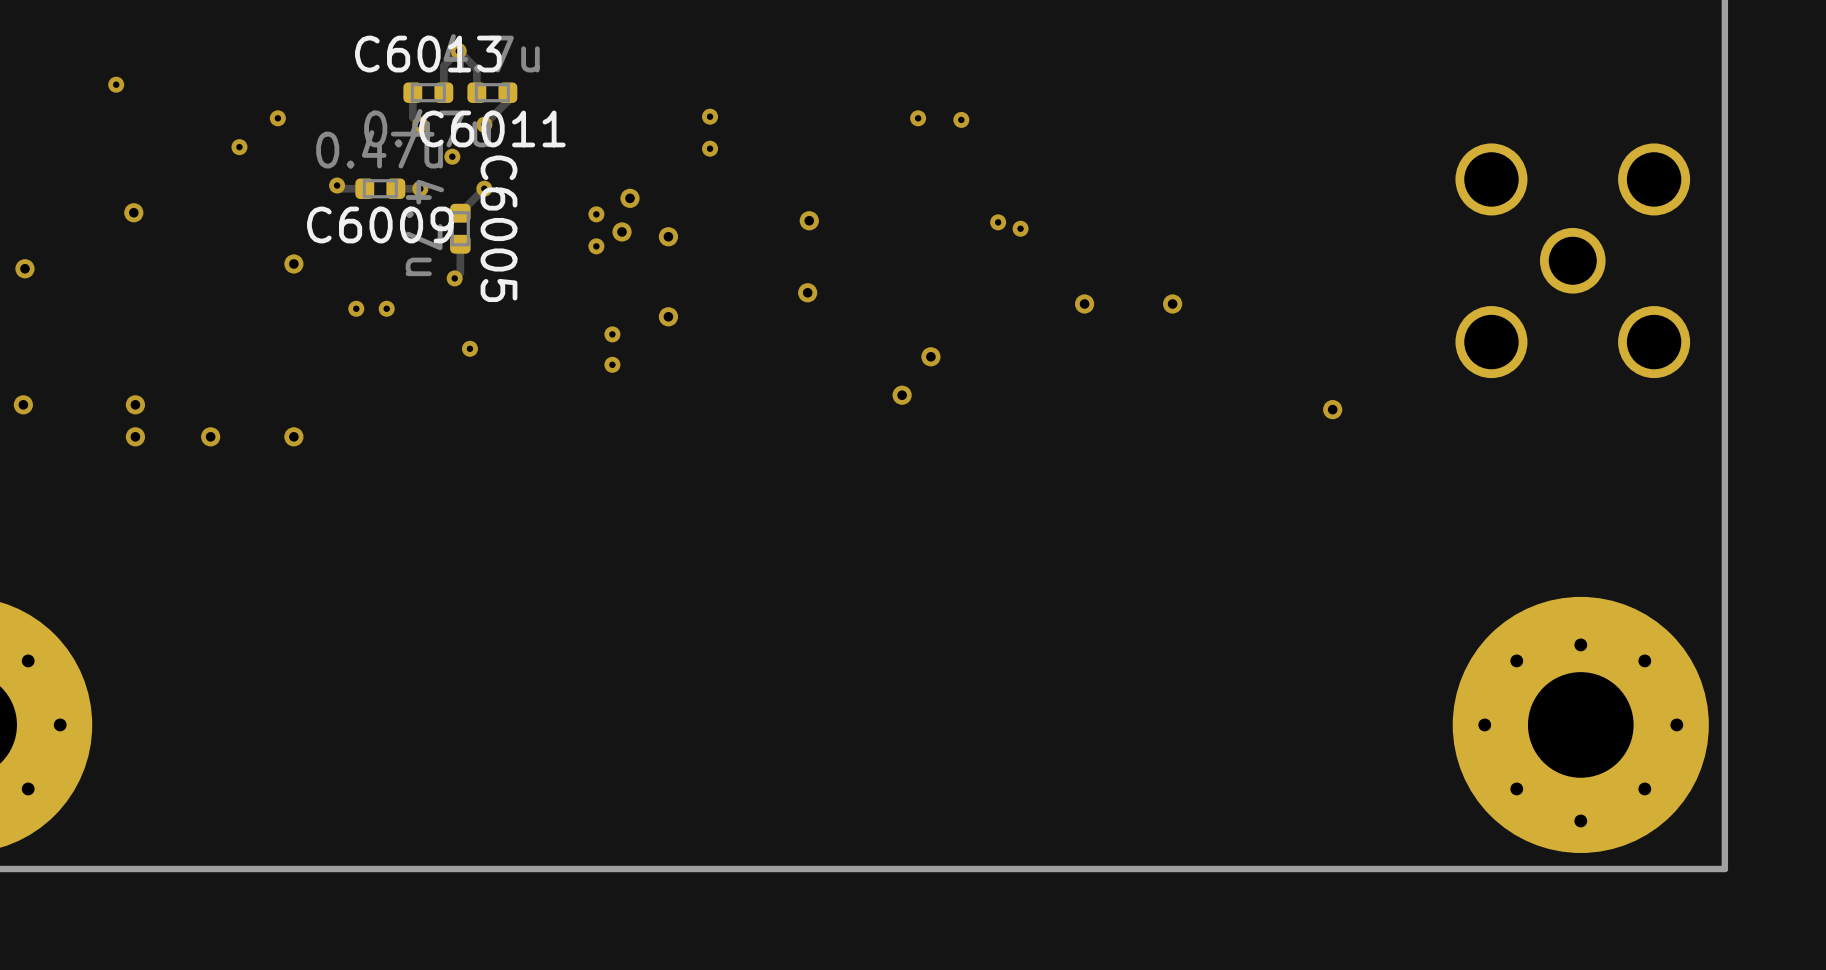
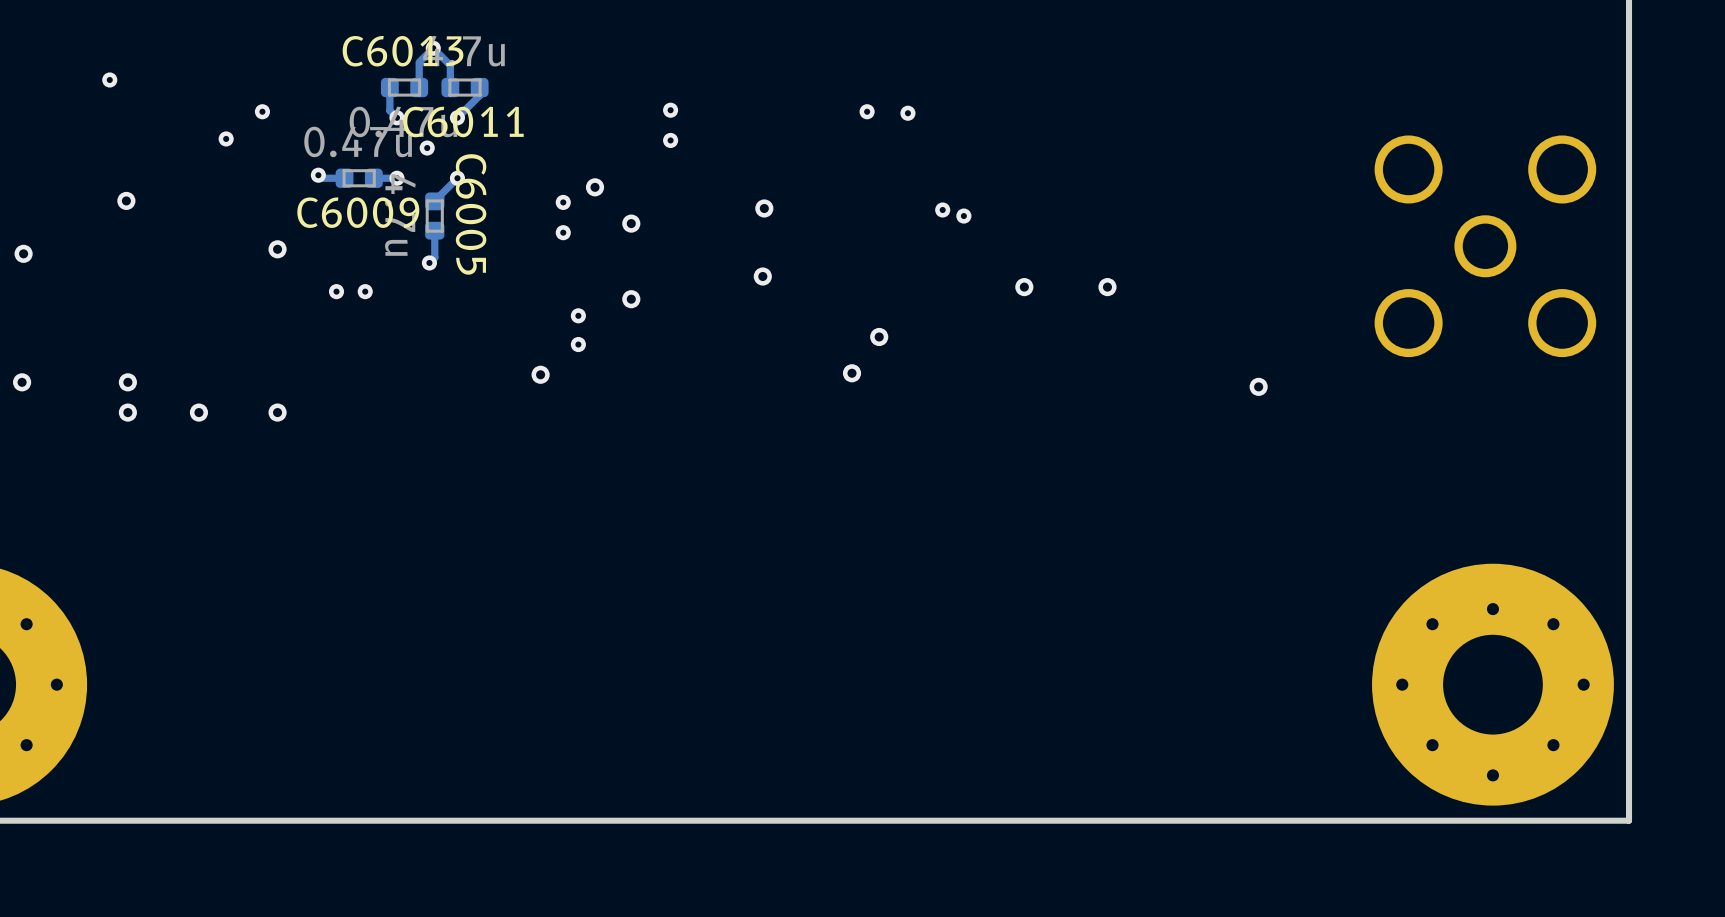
via position: (622, 231) -> (540, 374)
via: (469, 348) -> none

